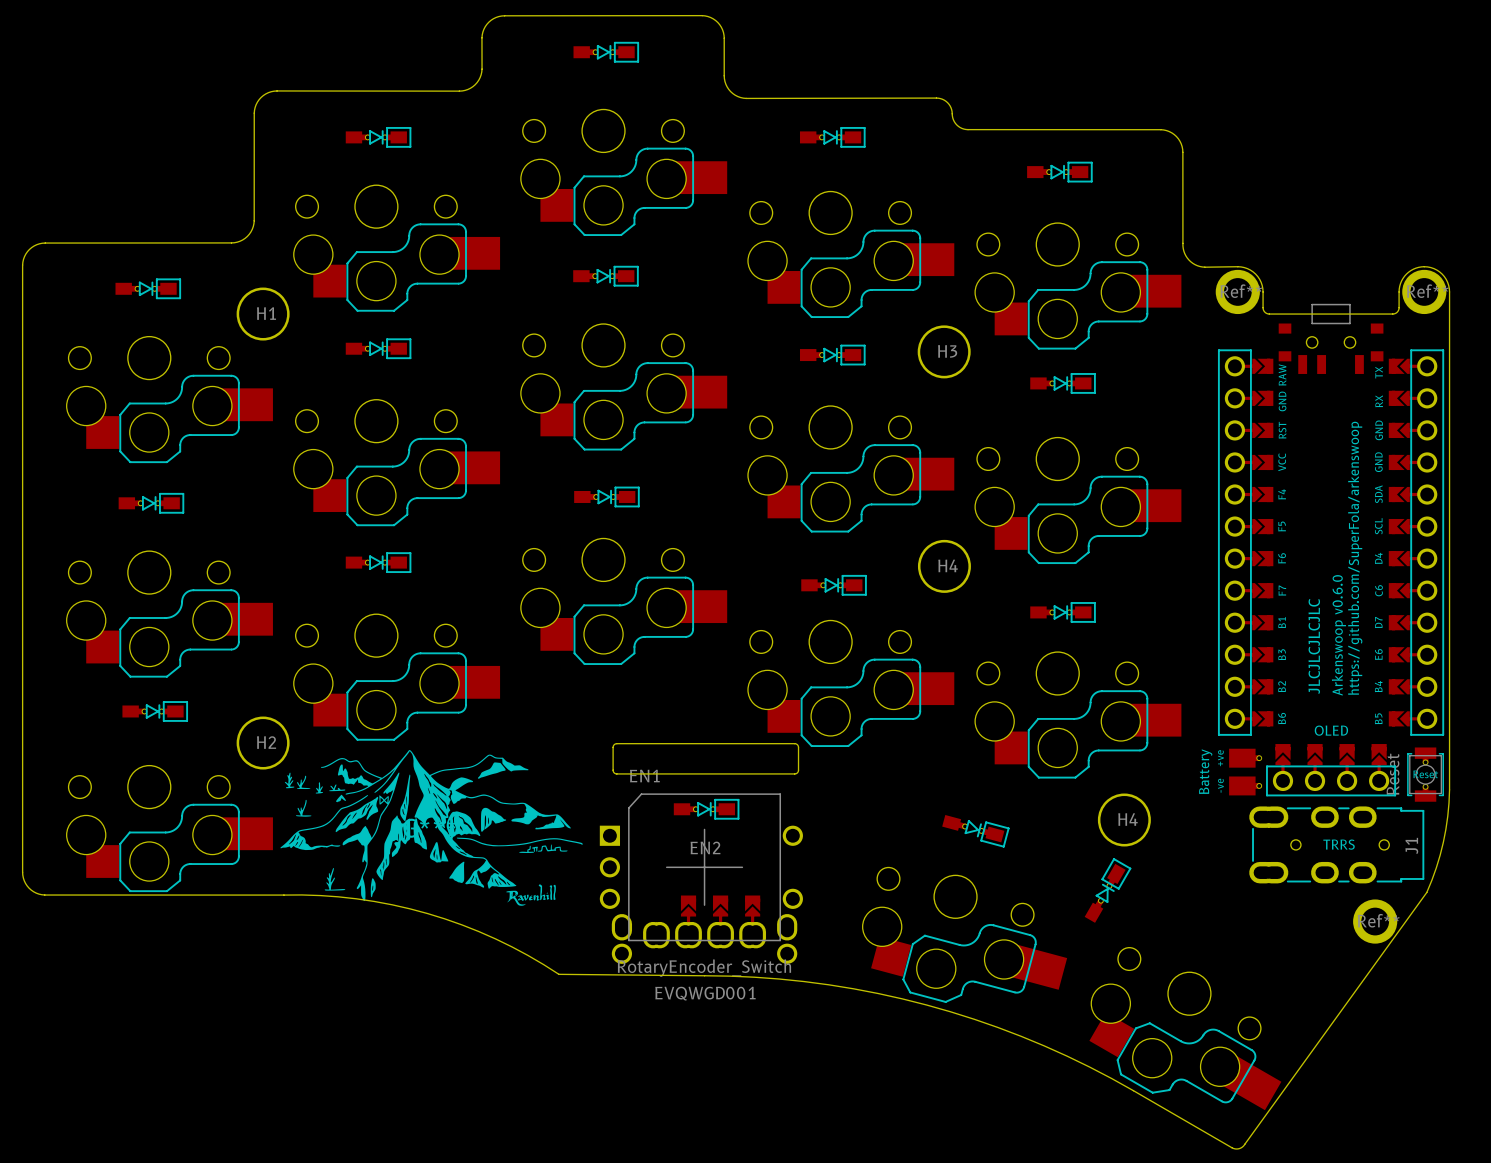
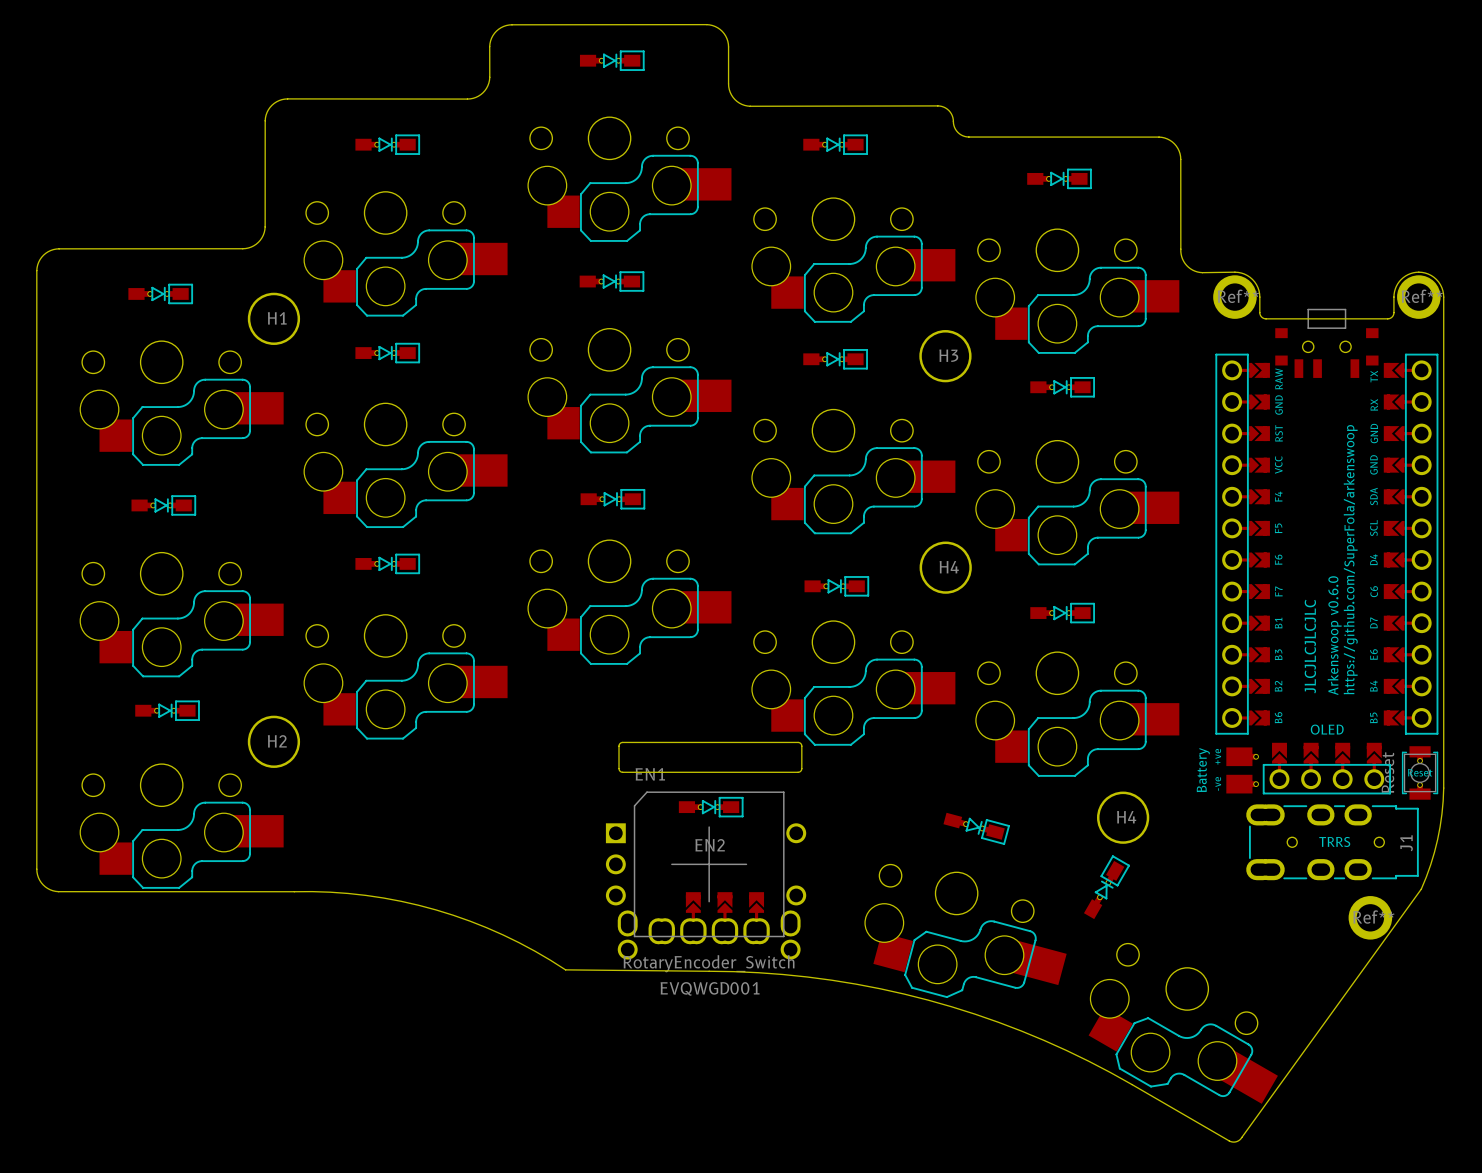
part: (431, 827) -> none

